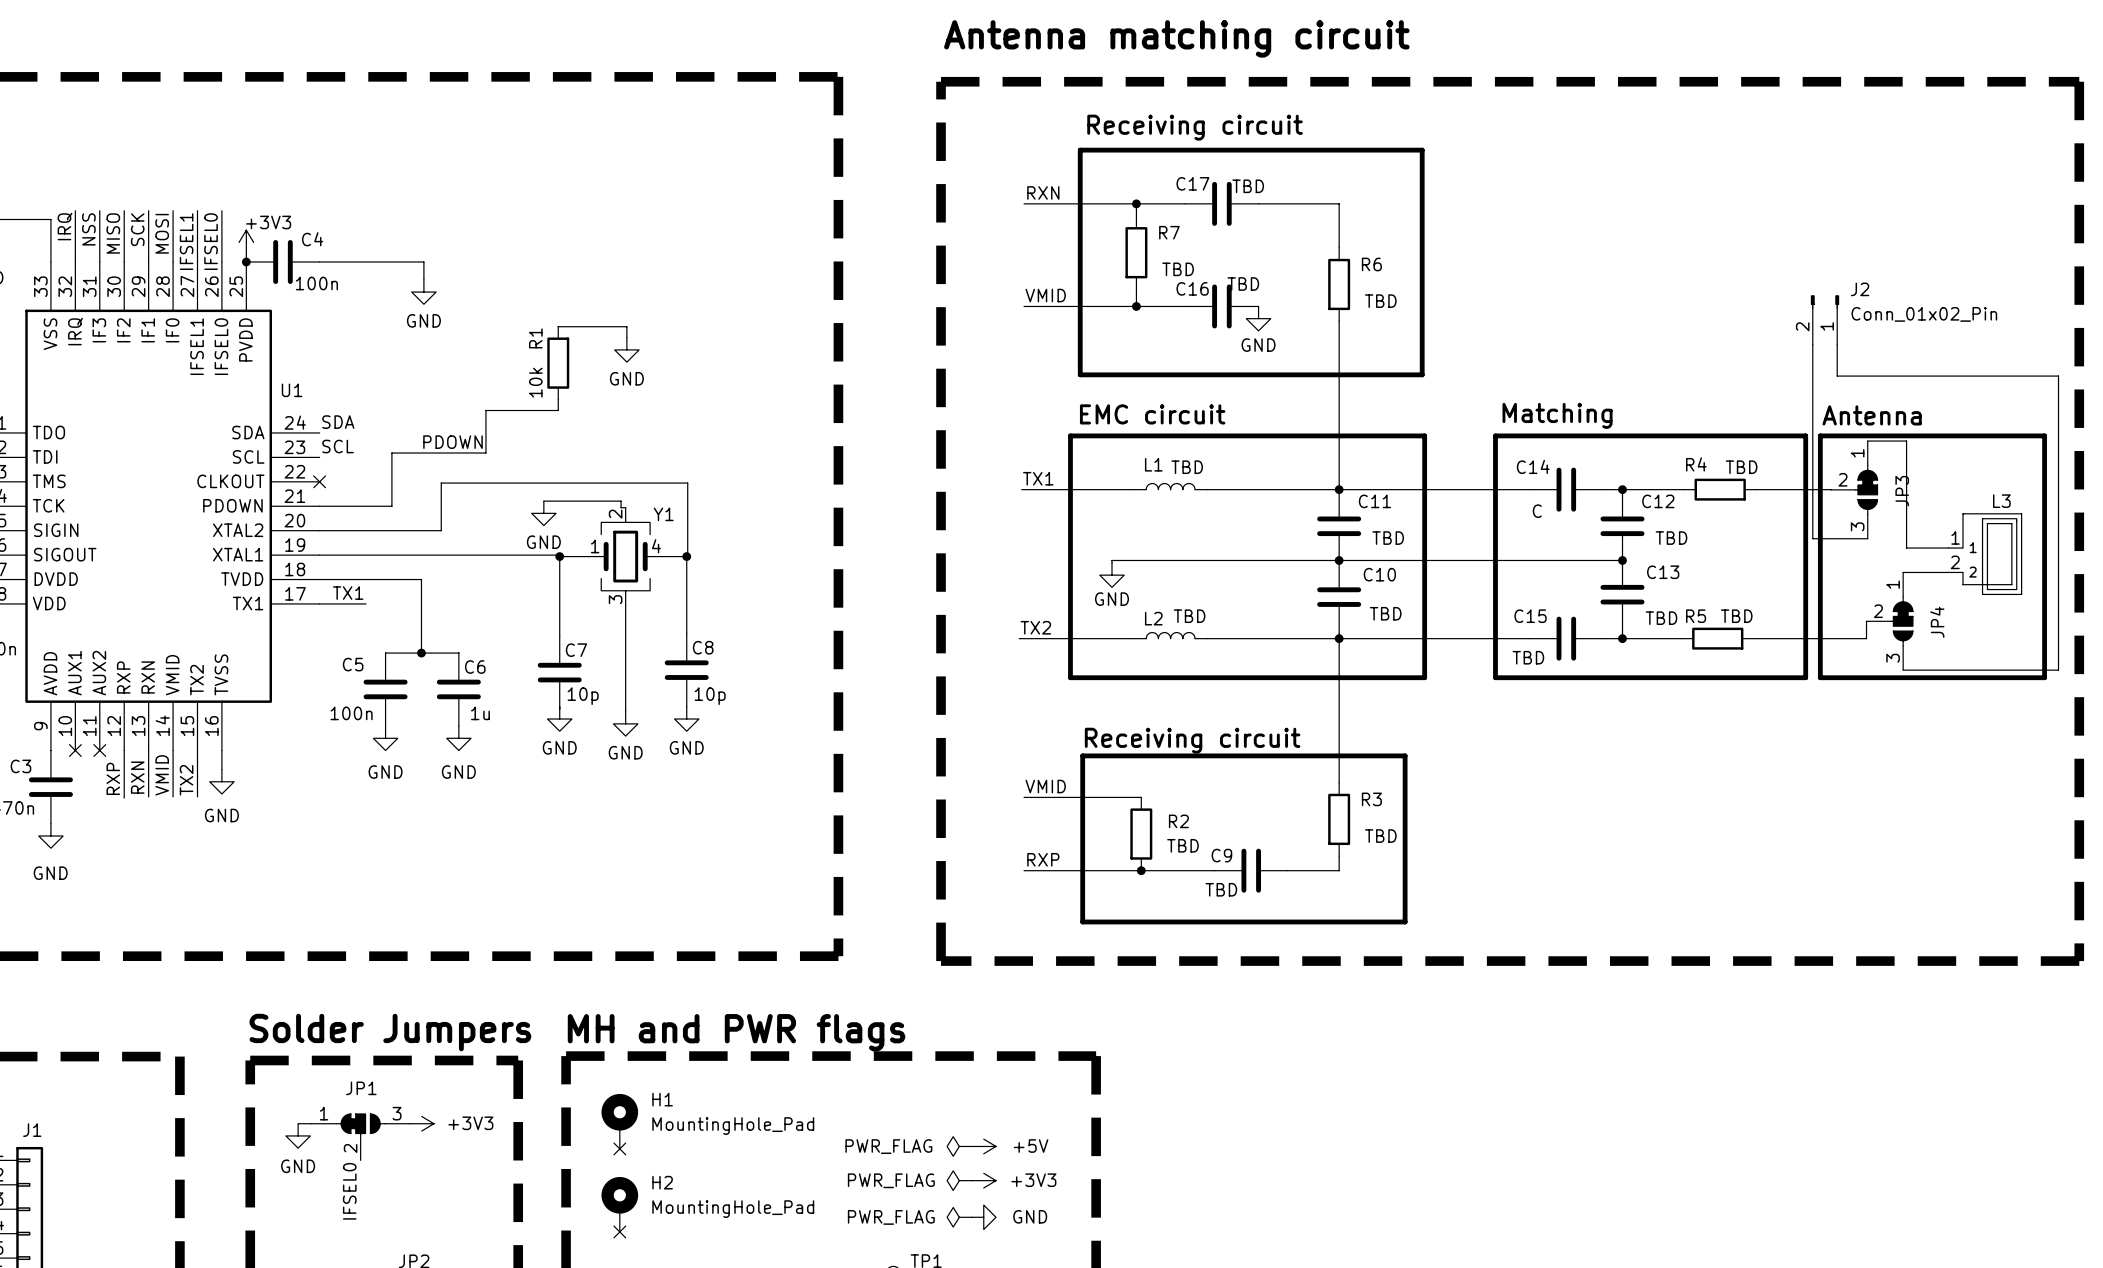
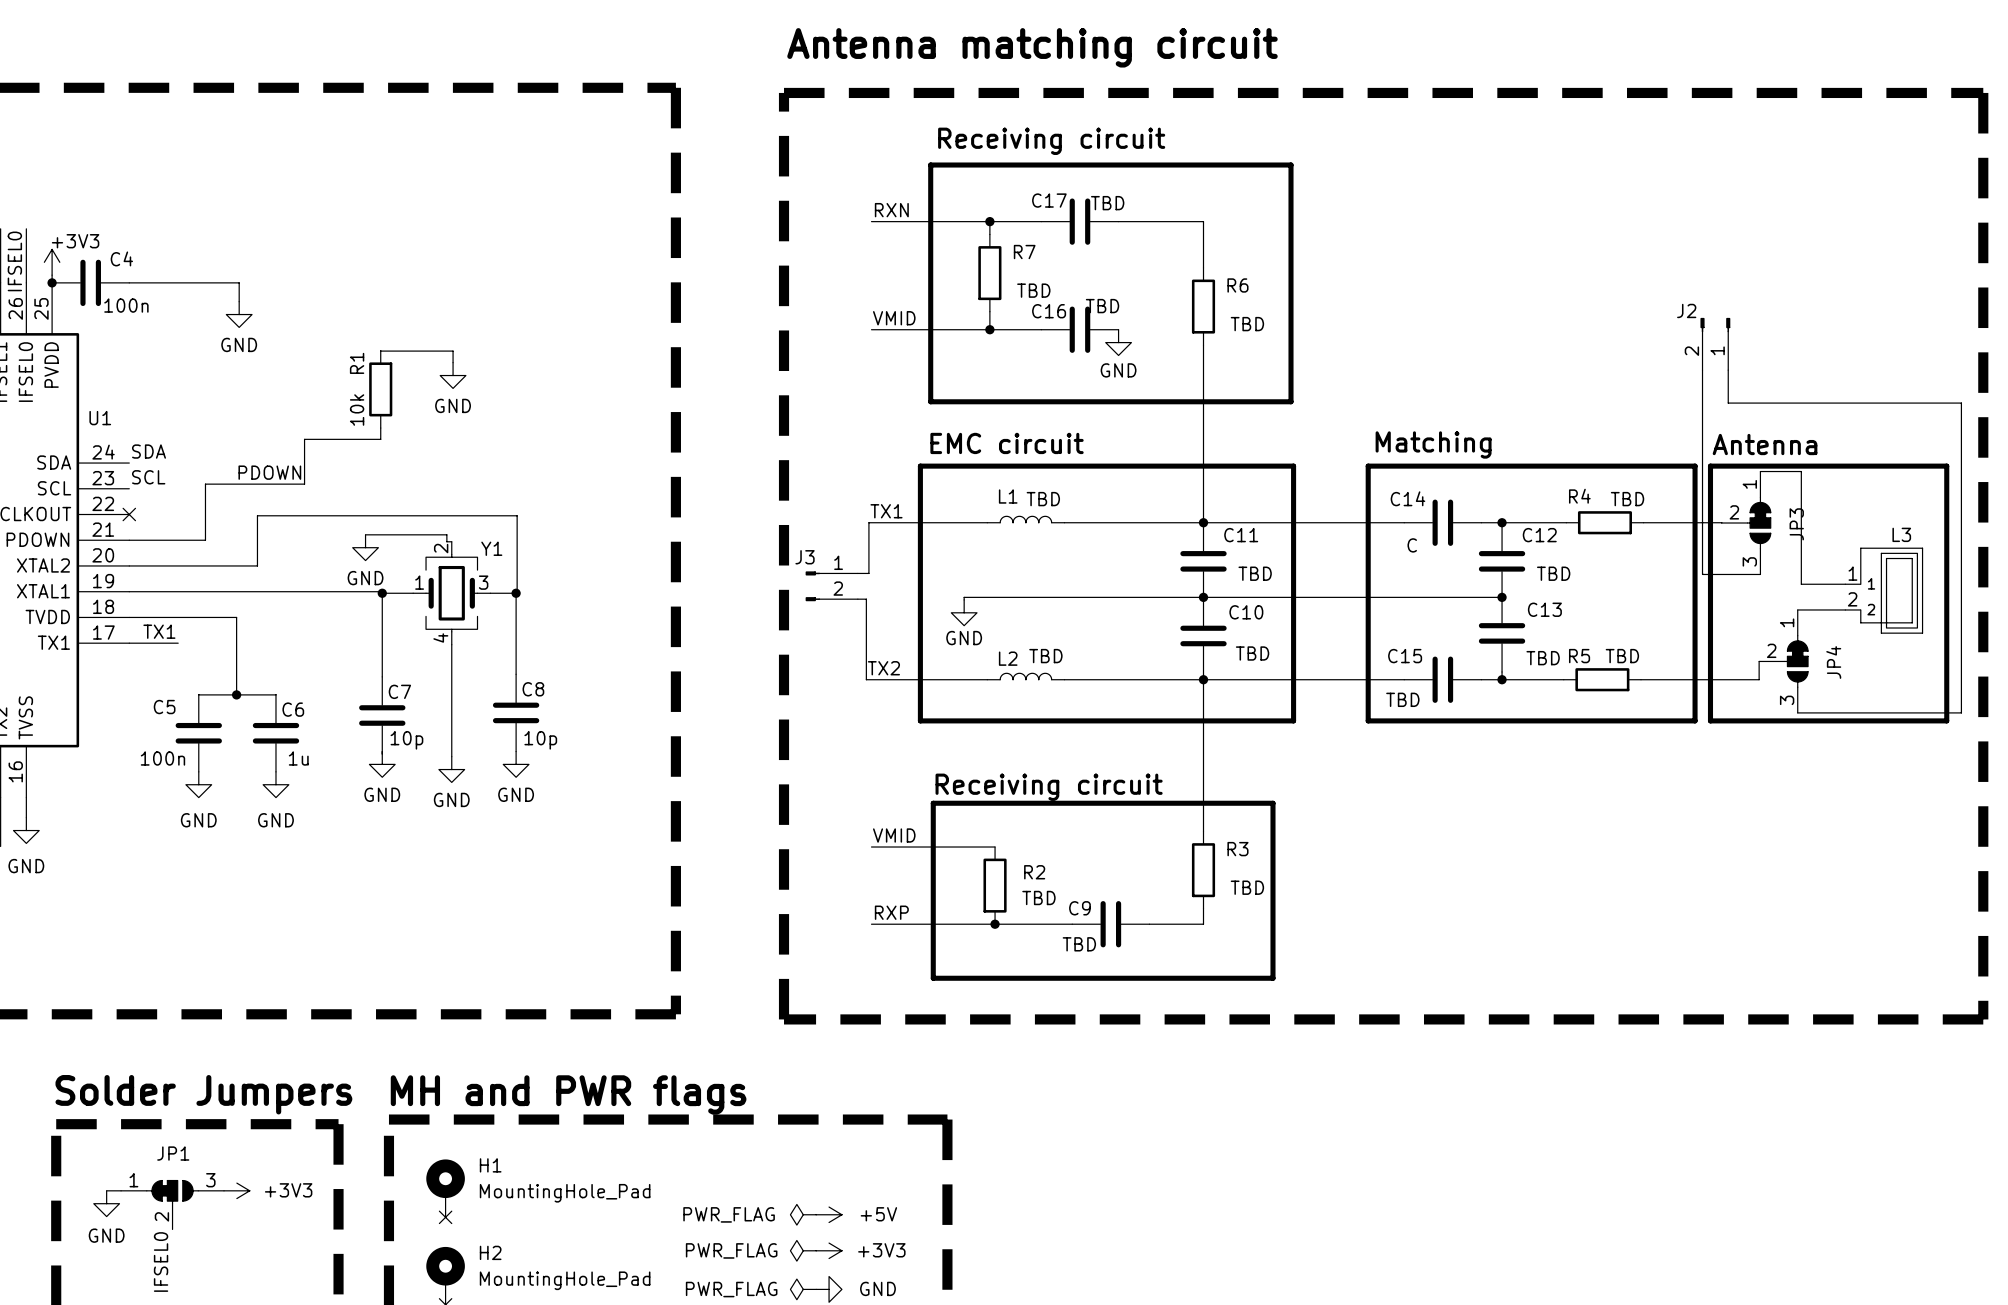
J2 name position: J2 (1860, 289) -> J2 (1686, 310)
J2 value: Conn_01x02_Pin (1924, 314) -> none
wire: none -> (868, 522) (868, 573) (857, 573)
Y1 pin number: 4 (656, 546) -> 3 (483, 582)
J3: none -> (831, 586)
wire: none -> (857, 599) (866, 599) (866, 679)
Y1 pin number: 3 (615, 599) -> 4 (440, 637)

